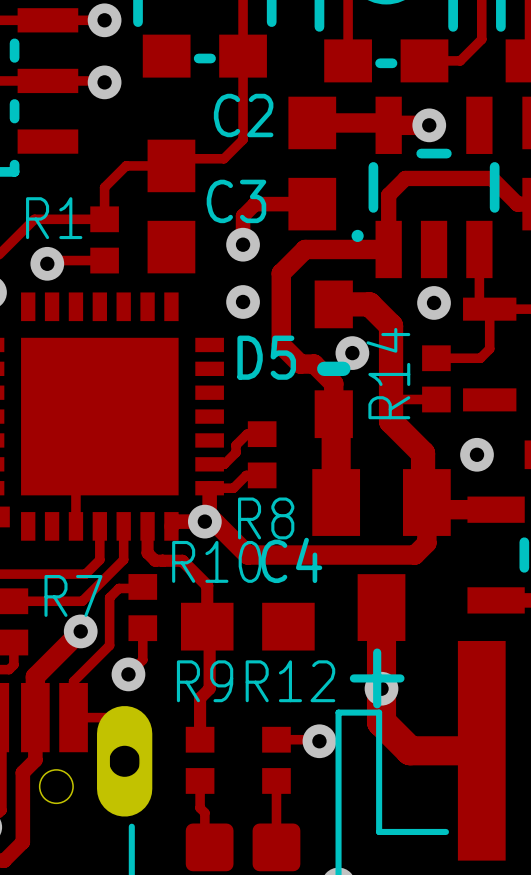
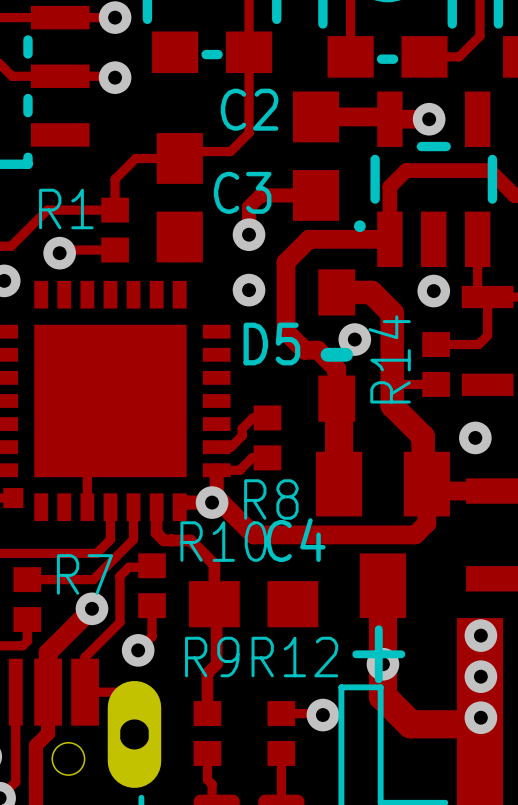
via: none -> (480, 635)
via: none -> (480, 676)
via: none -> (480, 717)

